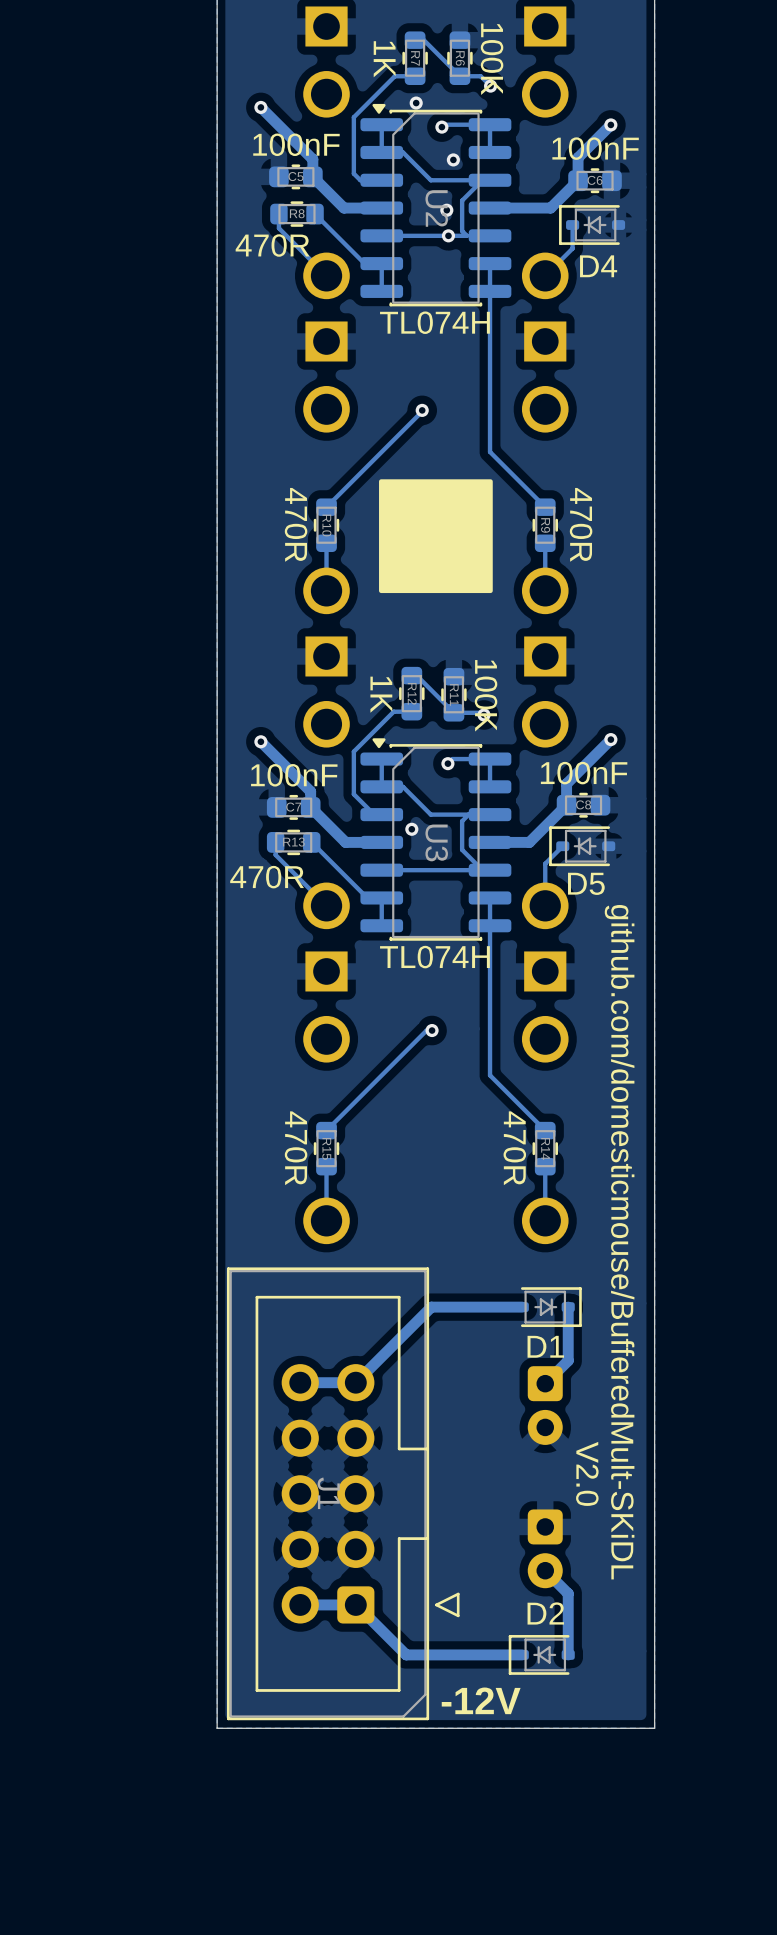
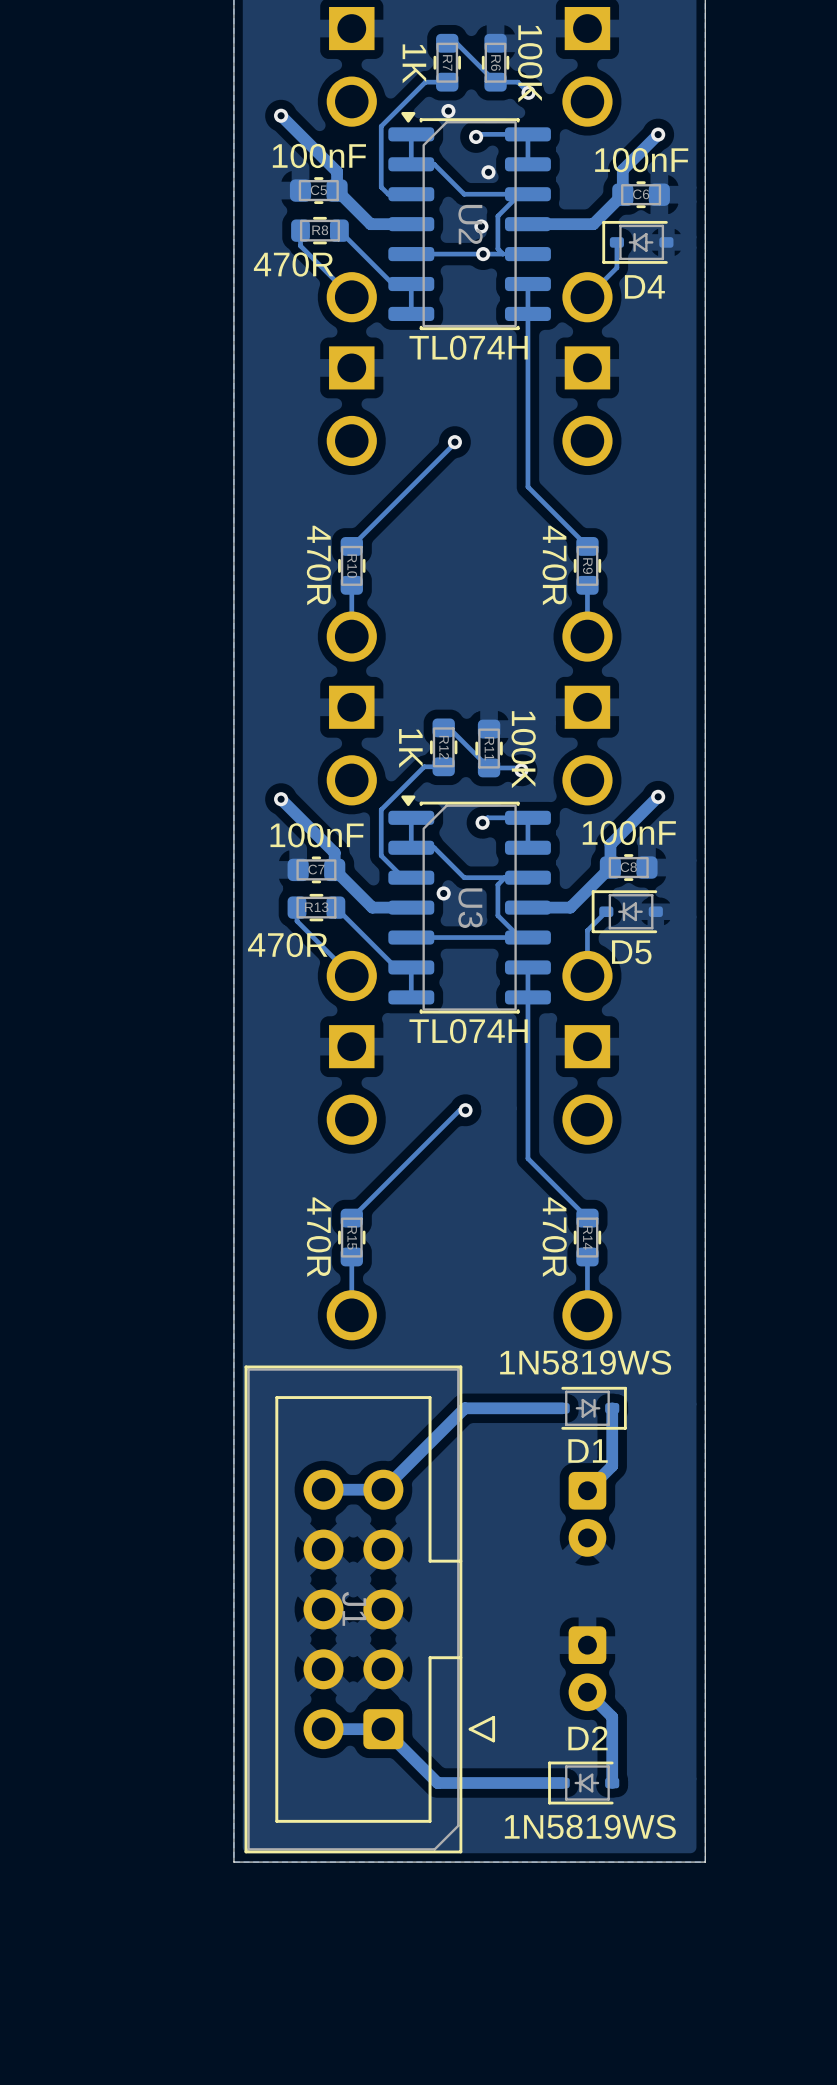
drawing: [379, 479, 493, 594] -> none
R9 value position: 470R (581, 524) -> 470R (554, 565)
text: github.com/domesticmouse/BufferedMult-SKiDL (619, 1242) -> none
D1 value: none -> 1N5819WS (585, 1362)
text: V2.0 (587, 1473) -> none
D2 value: none -> 1N5819WS (590, 1826)
text: -12V (481, 1700) -> none

